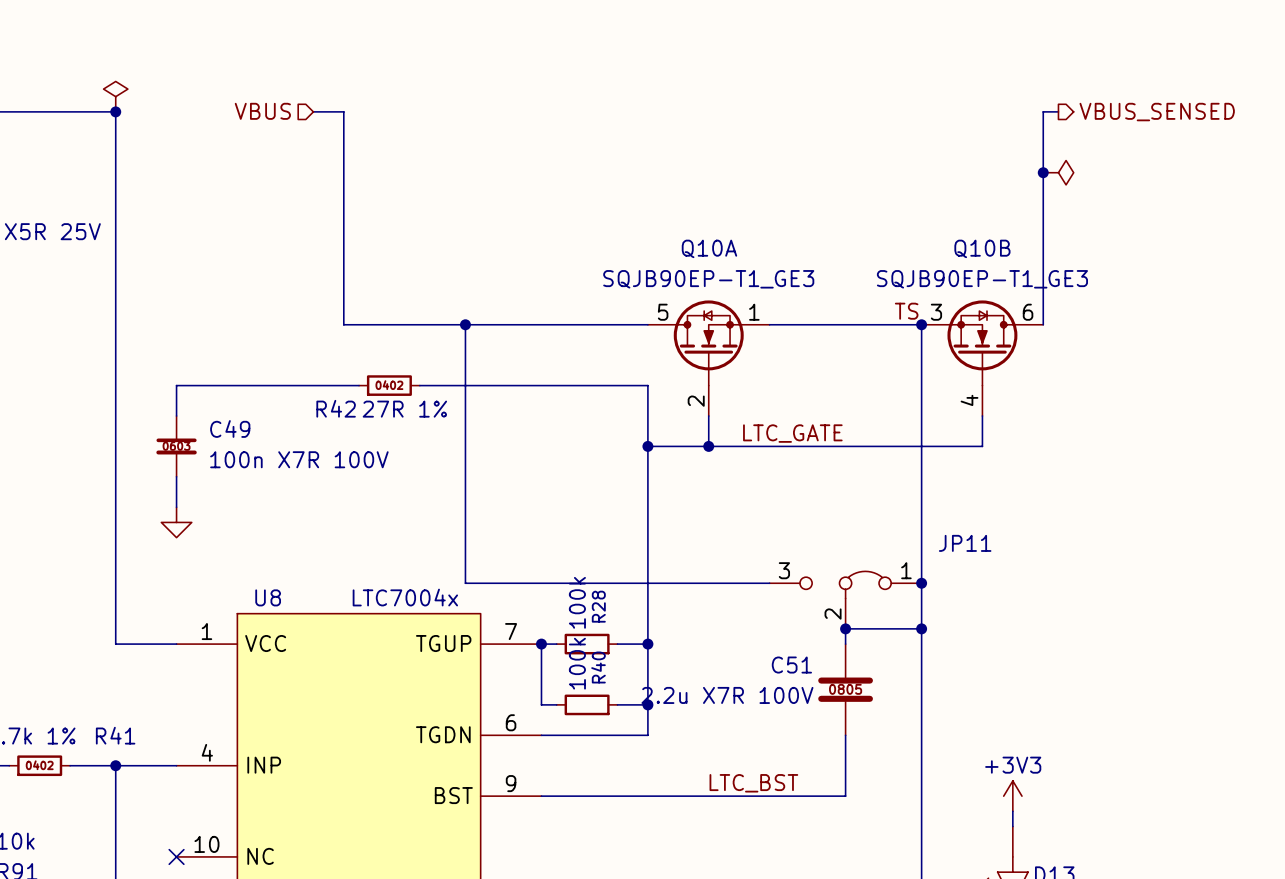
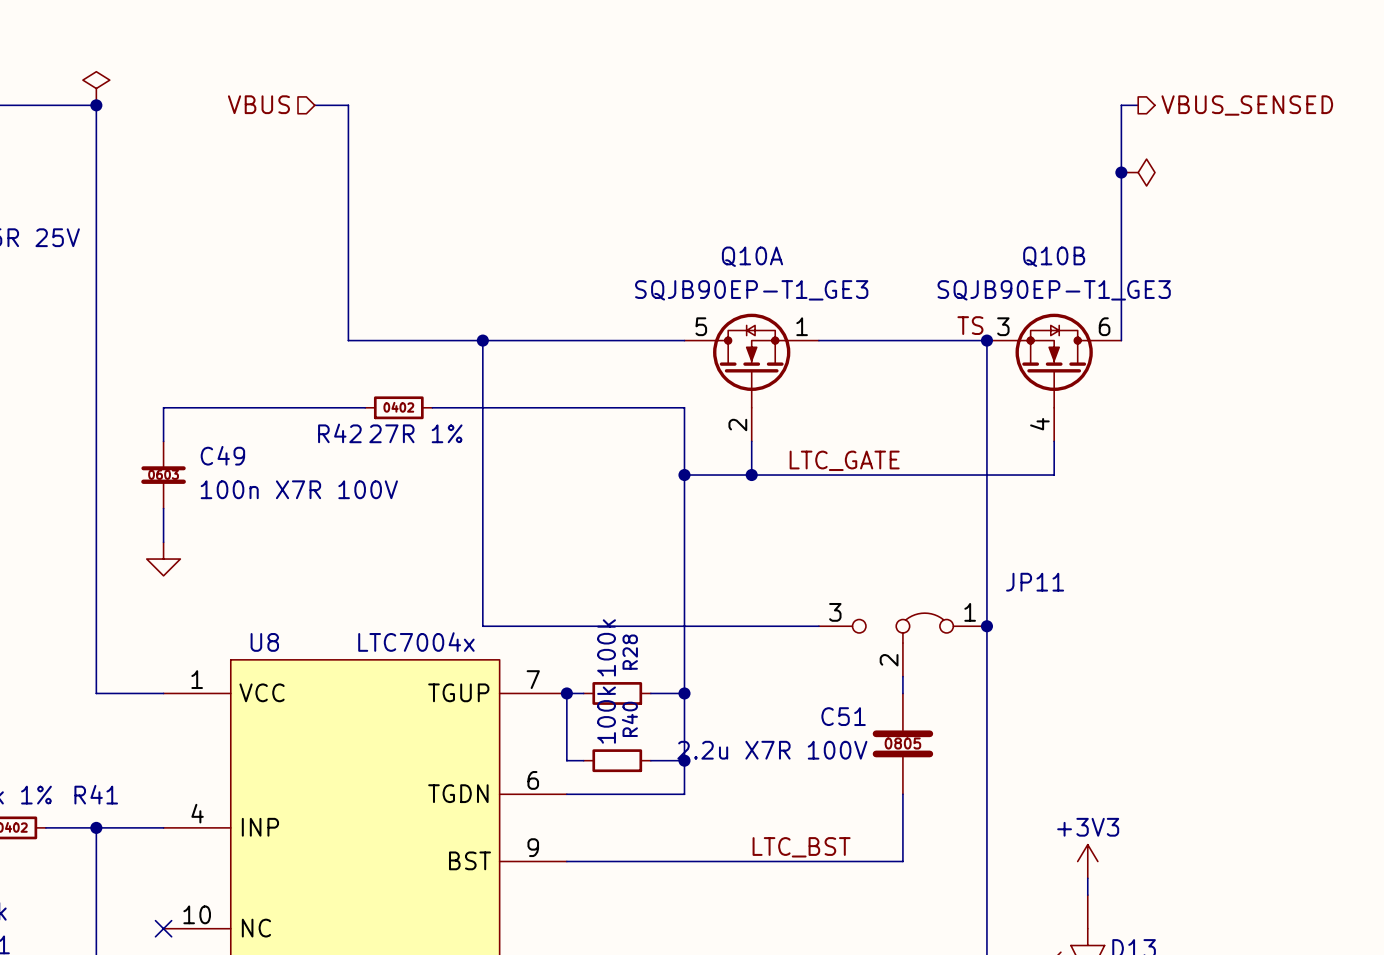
wire: (845, 628) (921, 628) -> none
junction: (845, 628) -> none
junction: (921, 628) -> none

